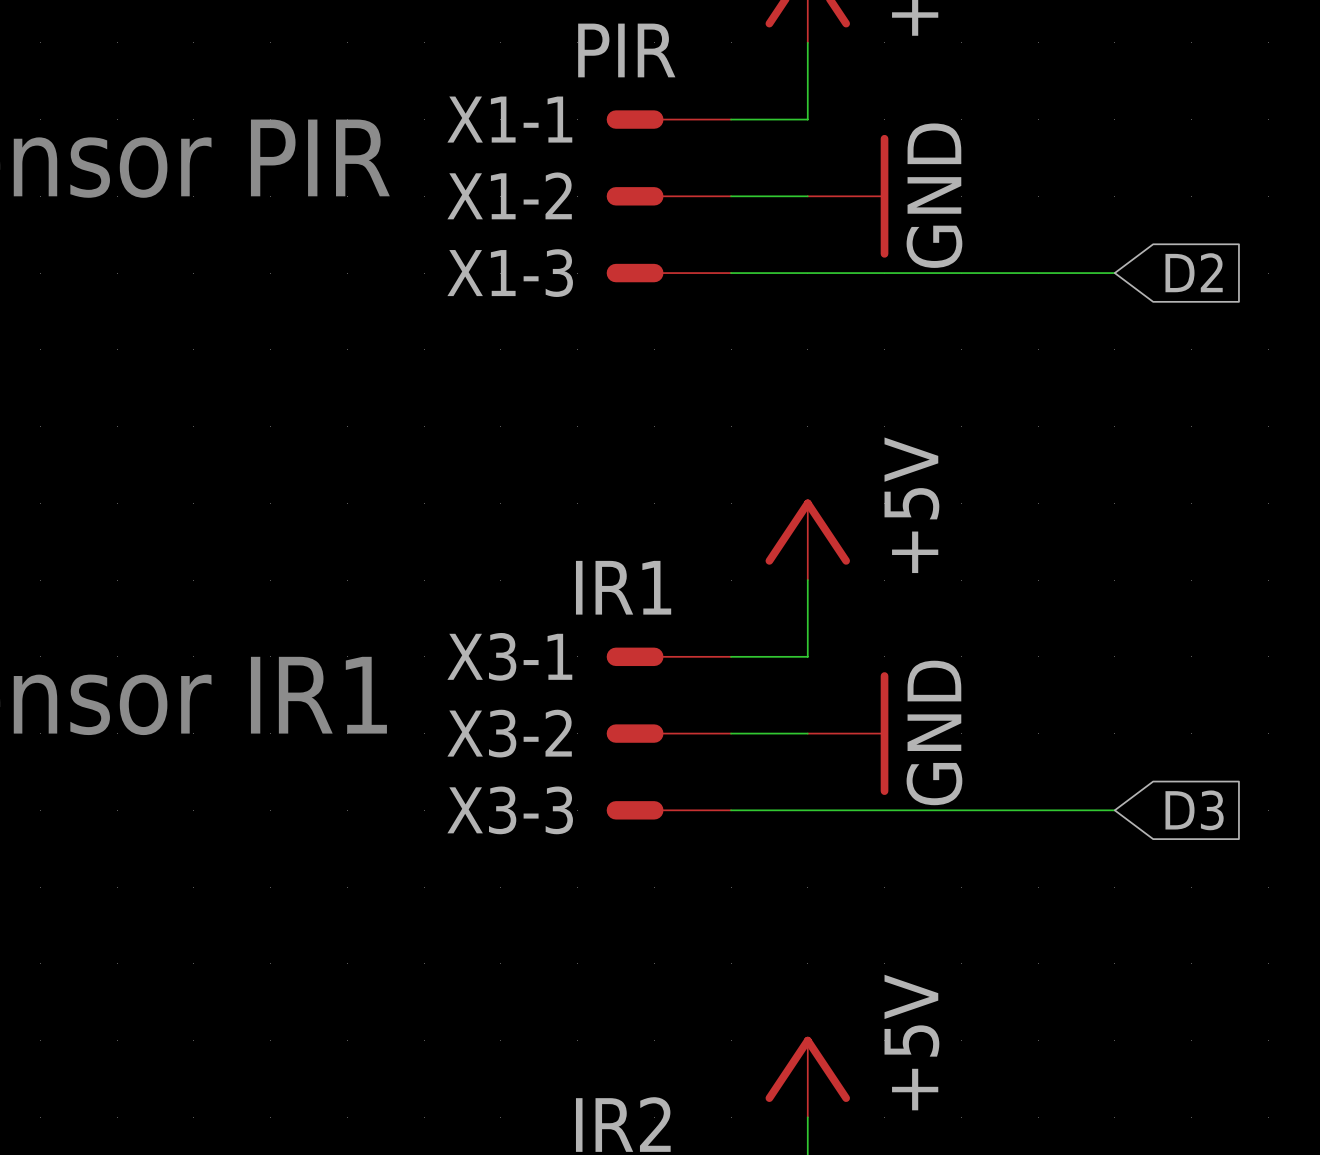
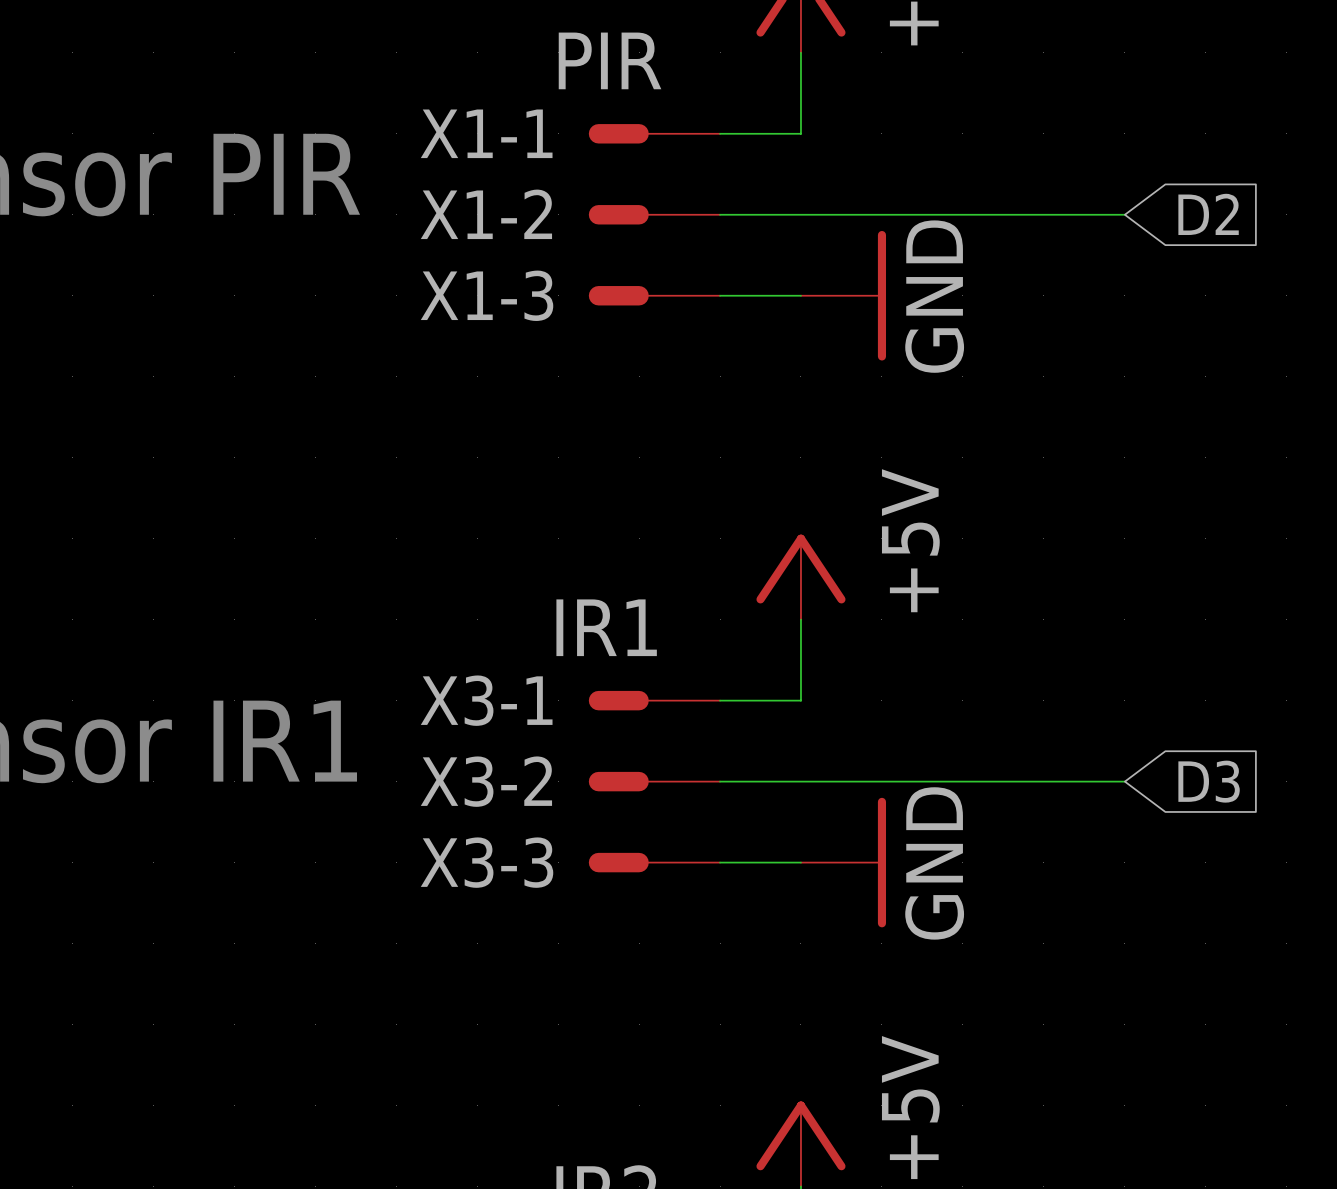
power symbol text position: GND (934, 195) -> GND (934, 296)
power symbol position: GND (848, 196) -> GND (843, 295)
global label position: D2 (1194, 272) -> D2 (1208, 214)
wire: (807, 273) (1114, 273) -> (800, 214) (1124, 214)
power symbol text position: GND (934, 732) -> GND (934, 863)
power symbol position: GND (848, 733) -> GND (843, 862)
wire: (807, 810) (1114, 810) -> (800, 781) (1124, 781)
global label position: D3 (1194, 810) -> D3 (1209, 781)

